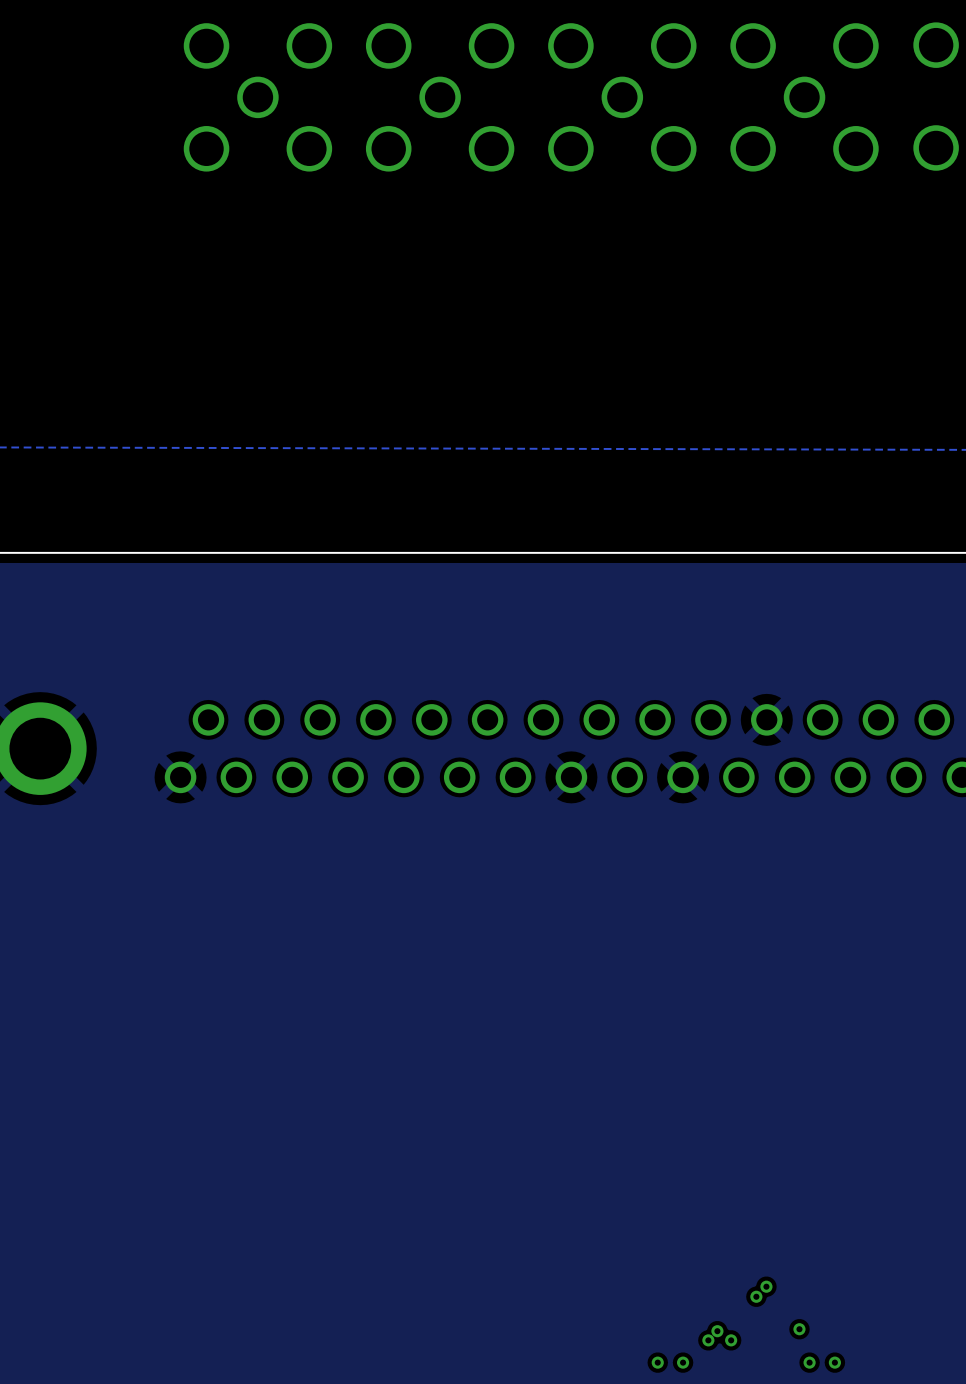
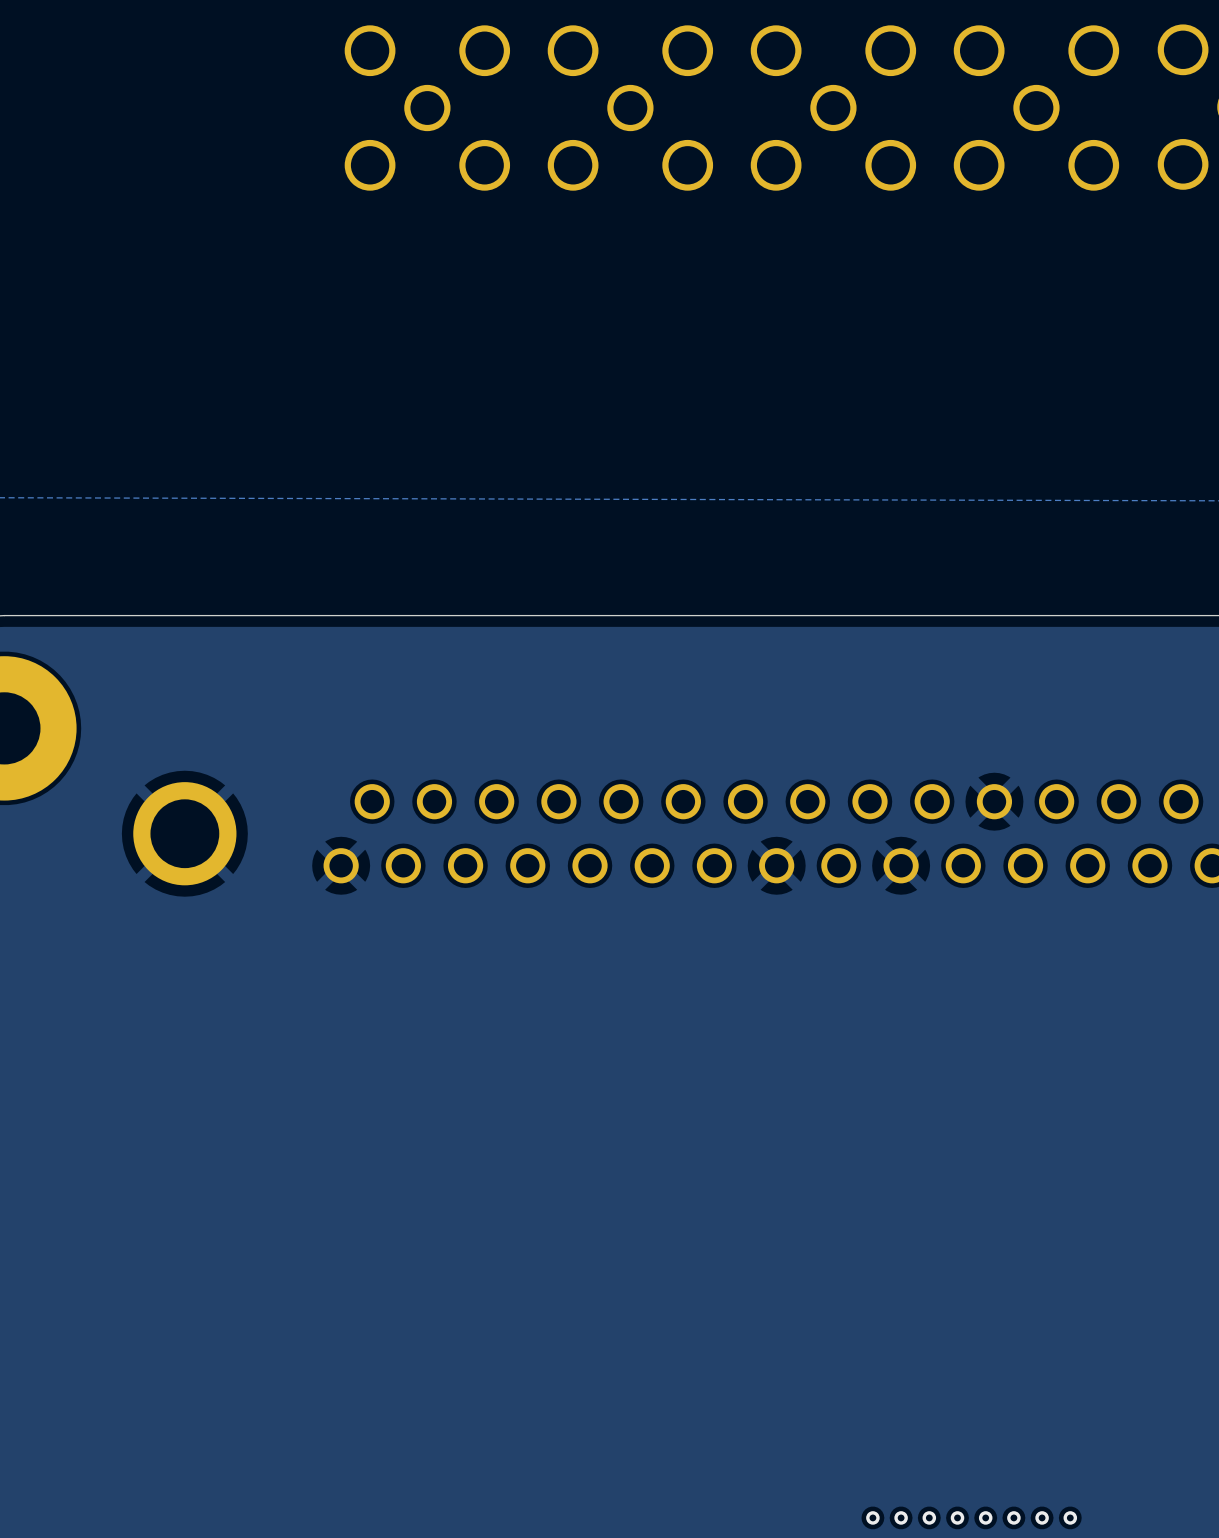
via: (766, 1286) -> none
via: (756, 1296) -> none
via: (799, 1329) -> none
via: (717, 1331) -> none
via: (708, 1340) -> none
via: (731, 1340) -> none
via: none -> (929, 1517)
via: none -> (957, 1517)
via: none -> (985, 1517)
via: none -> (1013, 1517)

